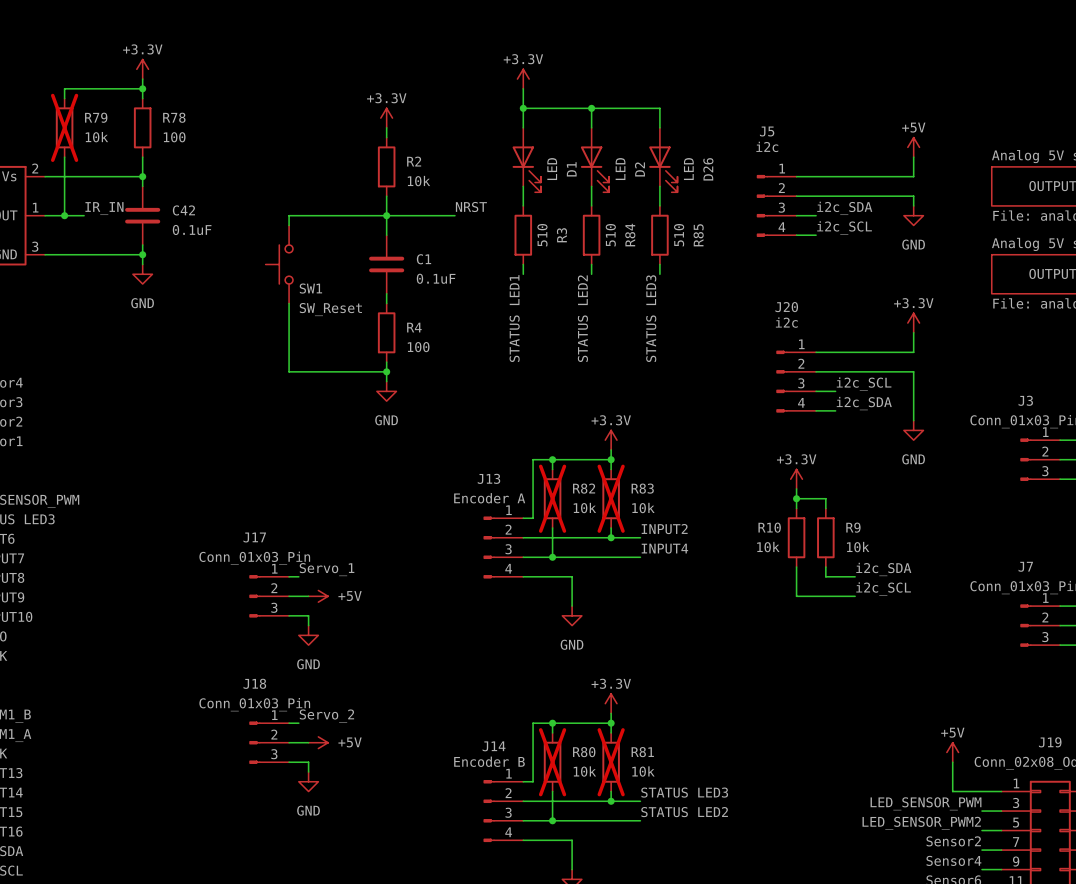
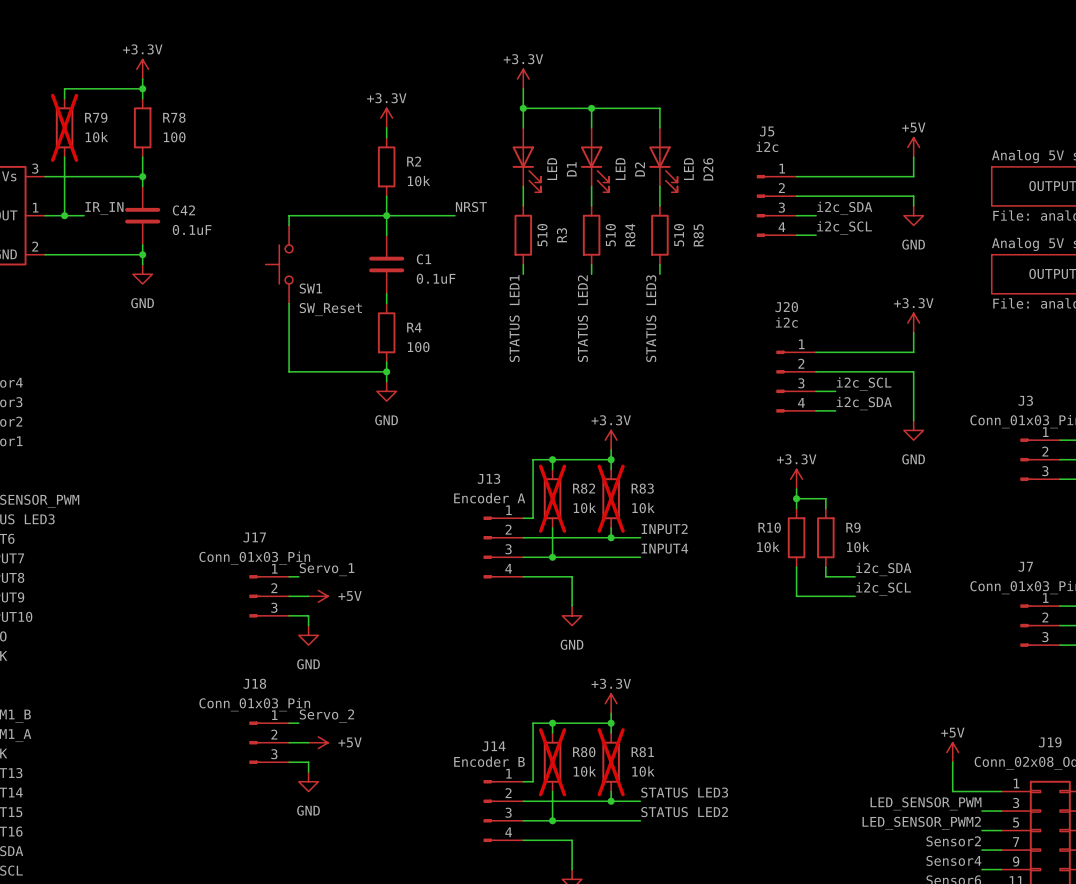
part pin number: 2 (35, 168) -> 3 (35, 168)
part pin number: 3 (35, 246) -> 2 (35, 246)

